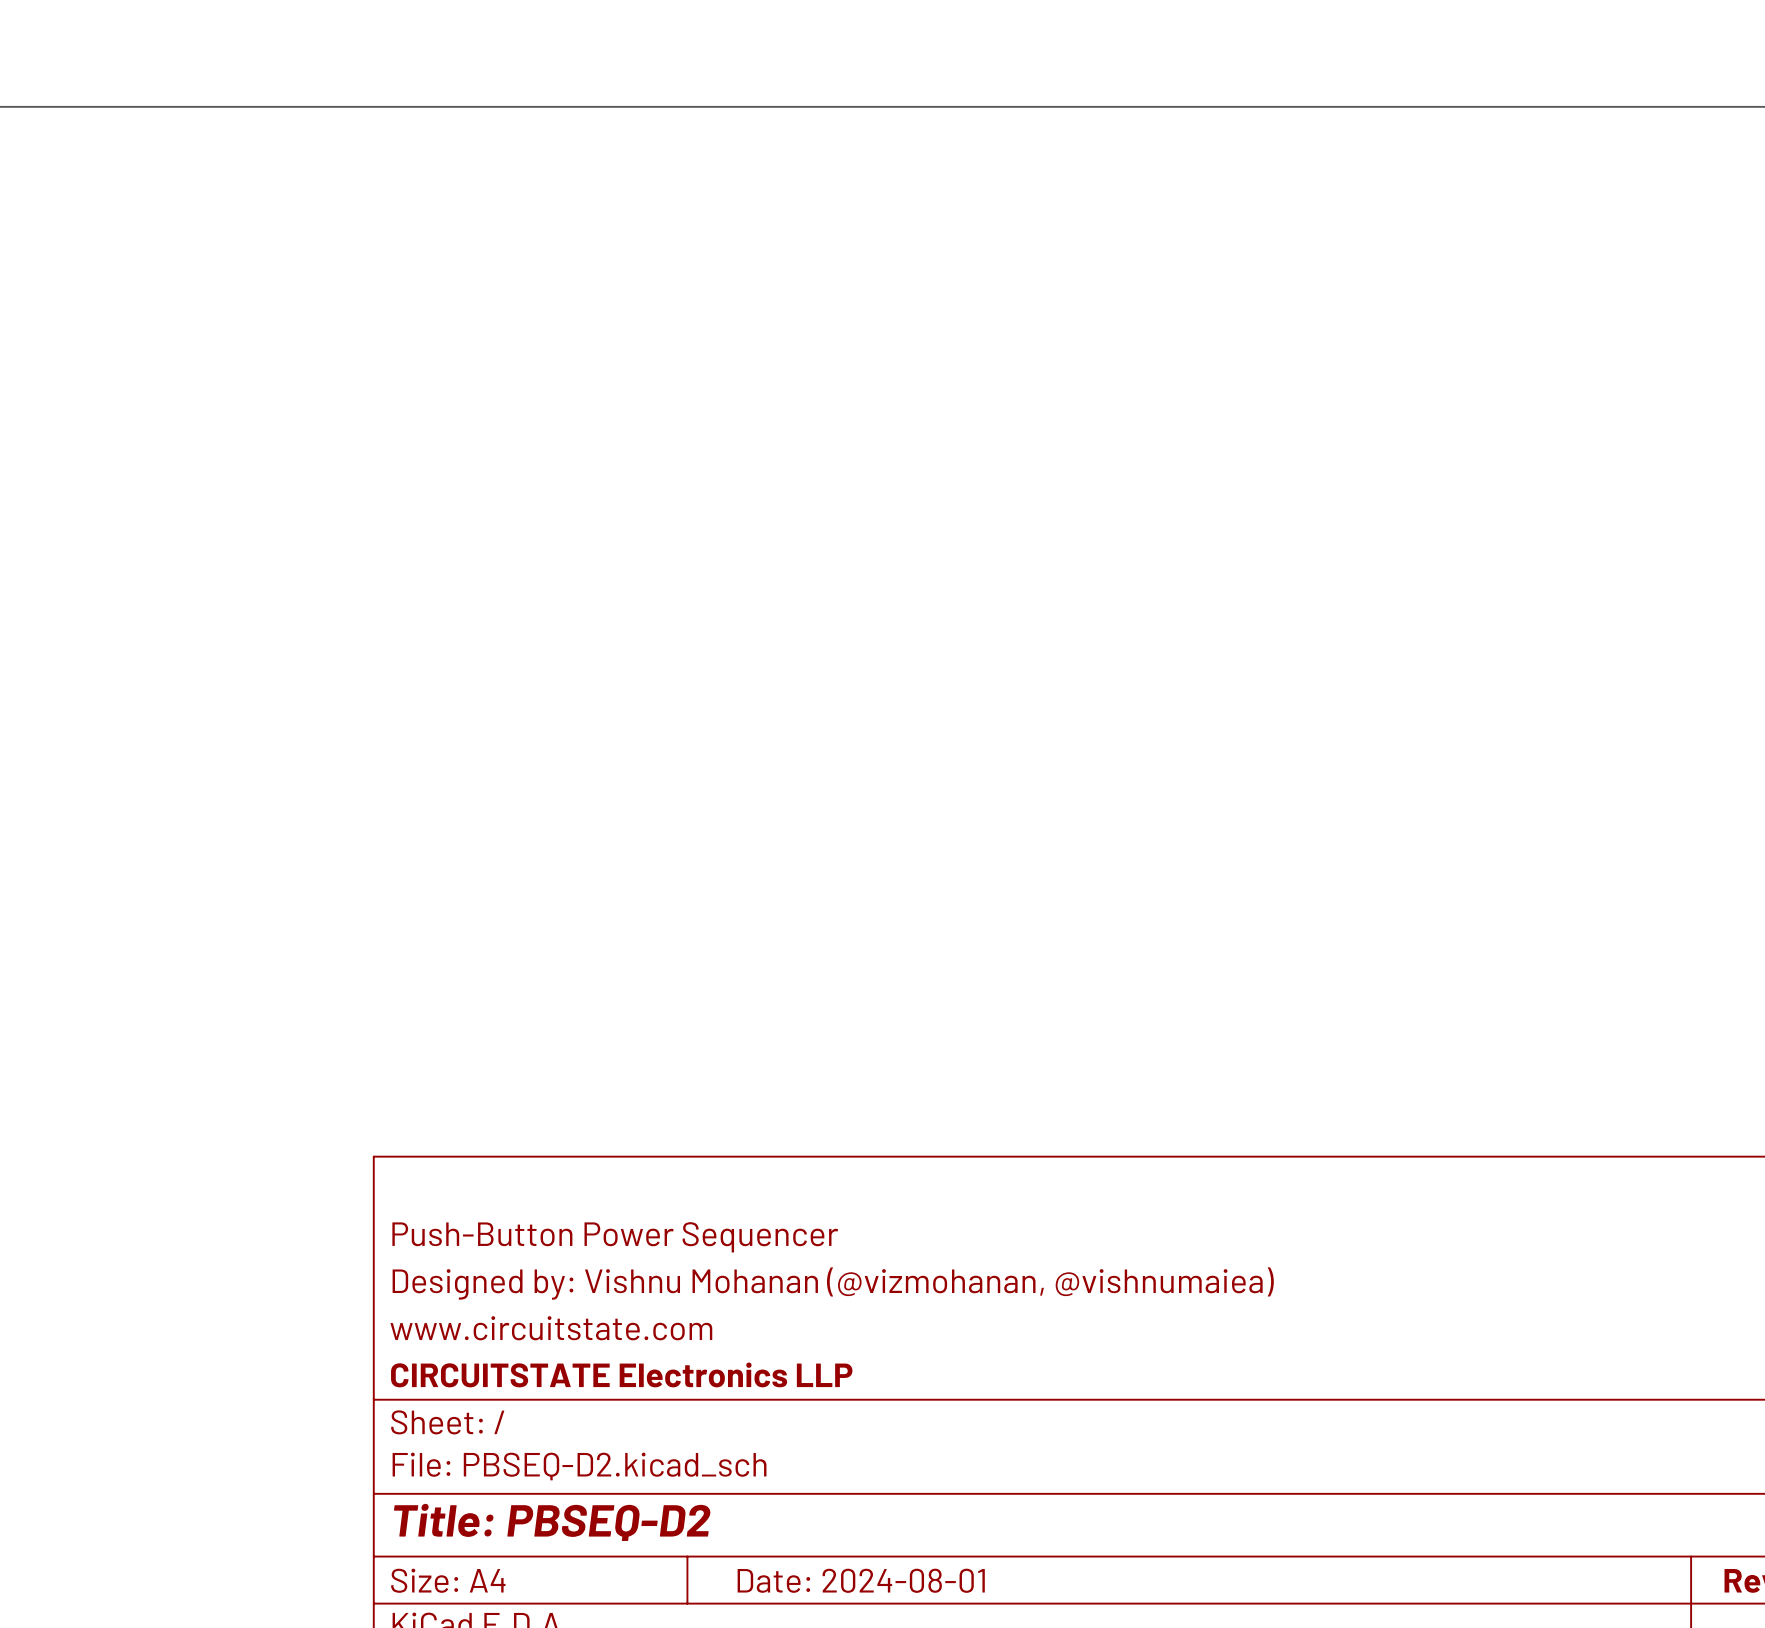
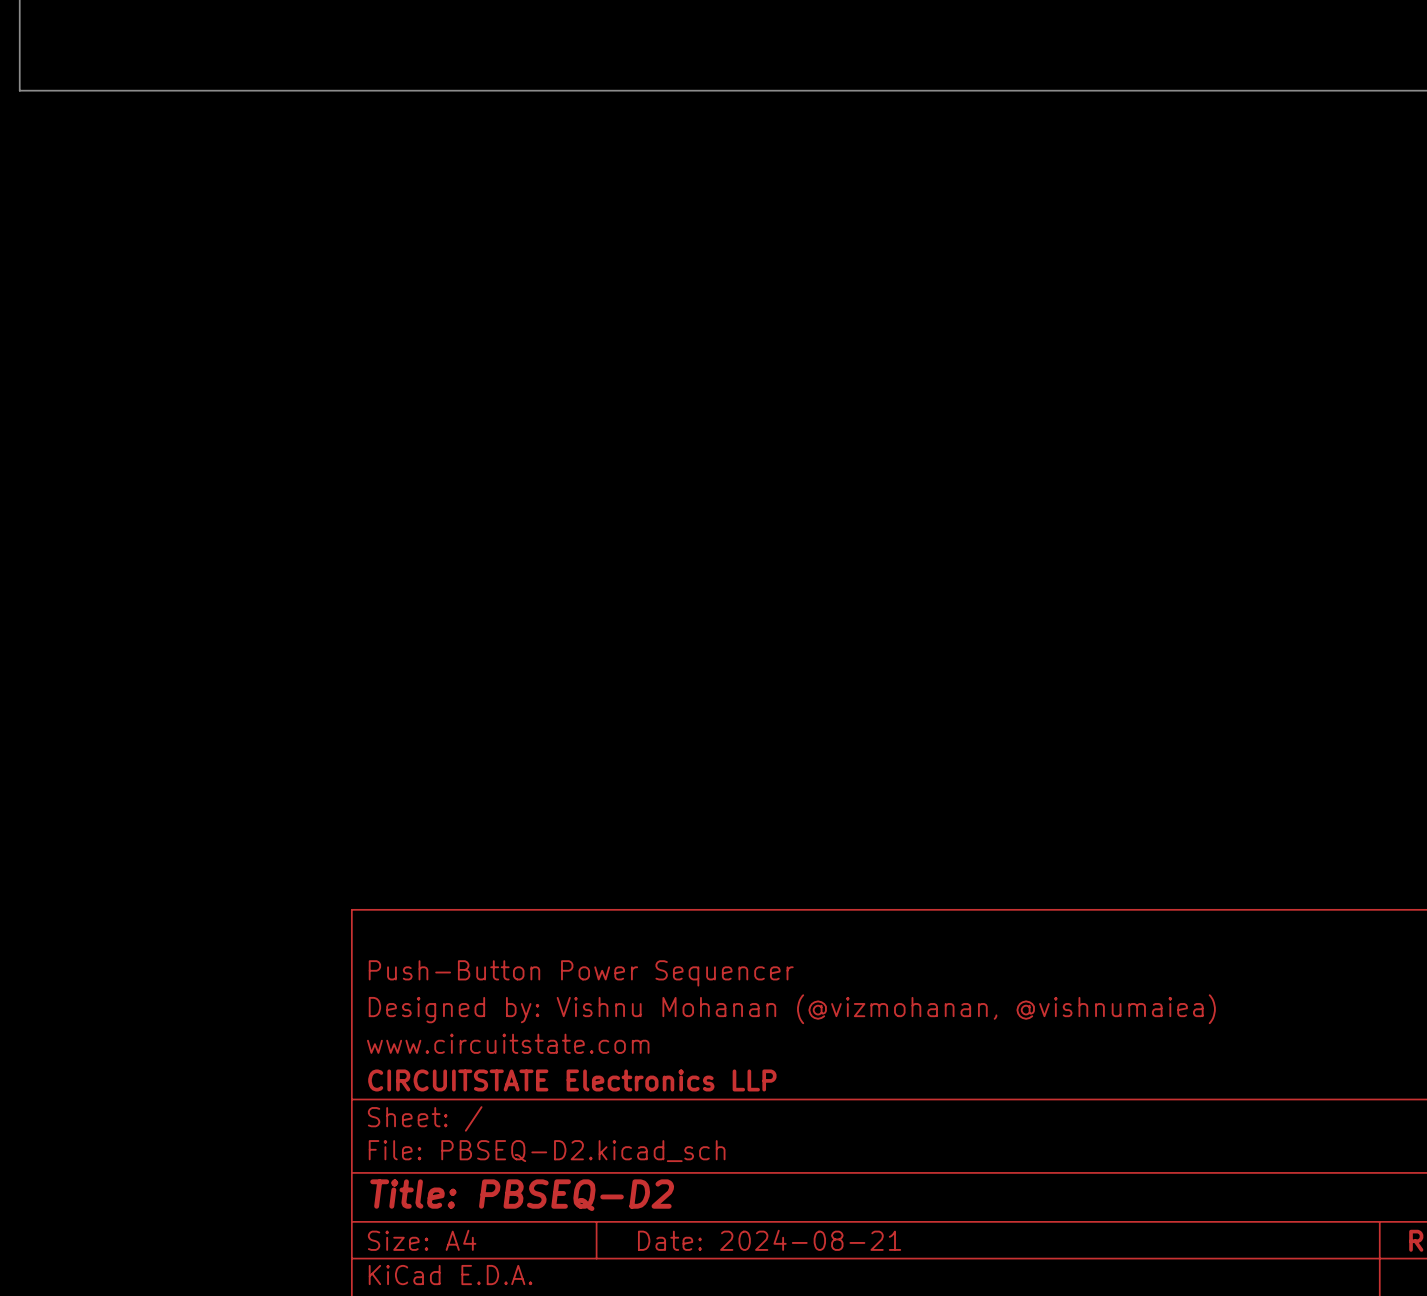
title block: Date: 2024-08-01 (861, 1580) -> Date: 2024-08-21 (769, 1240)

